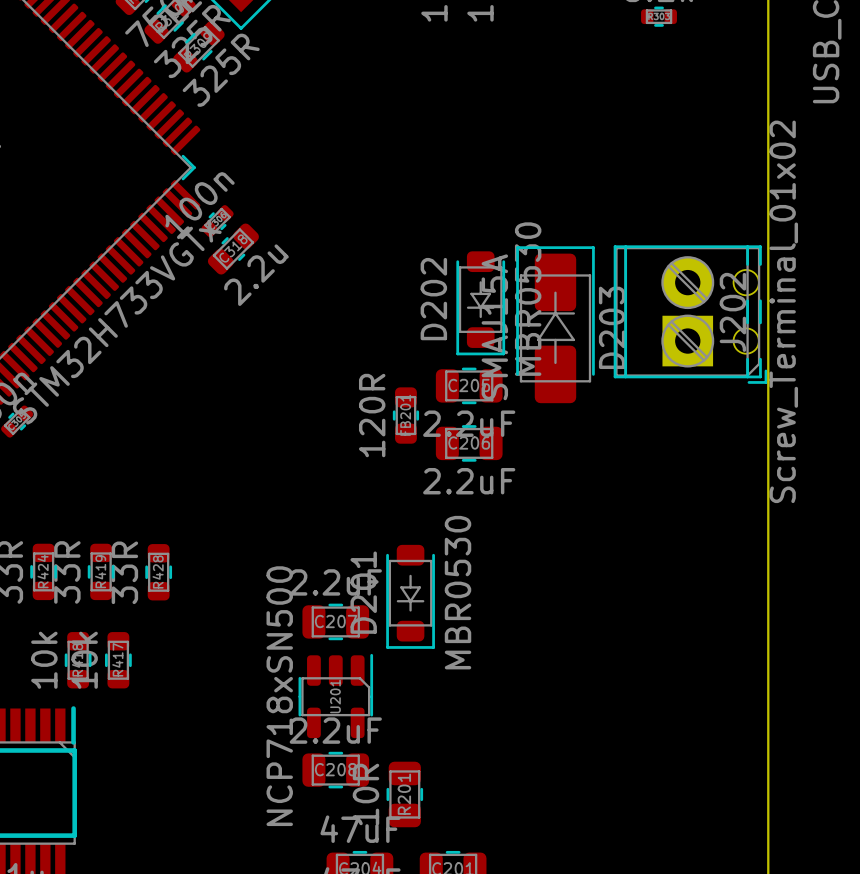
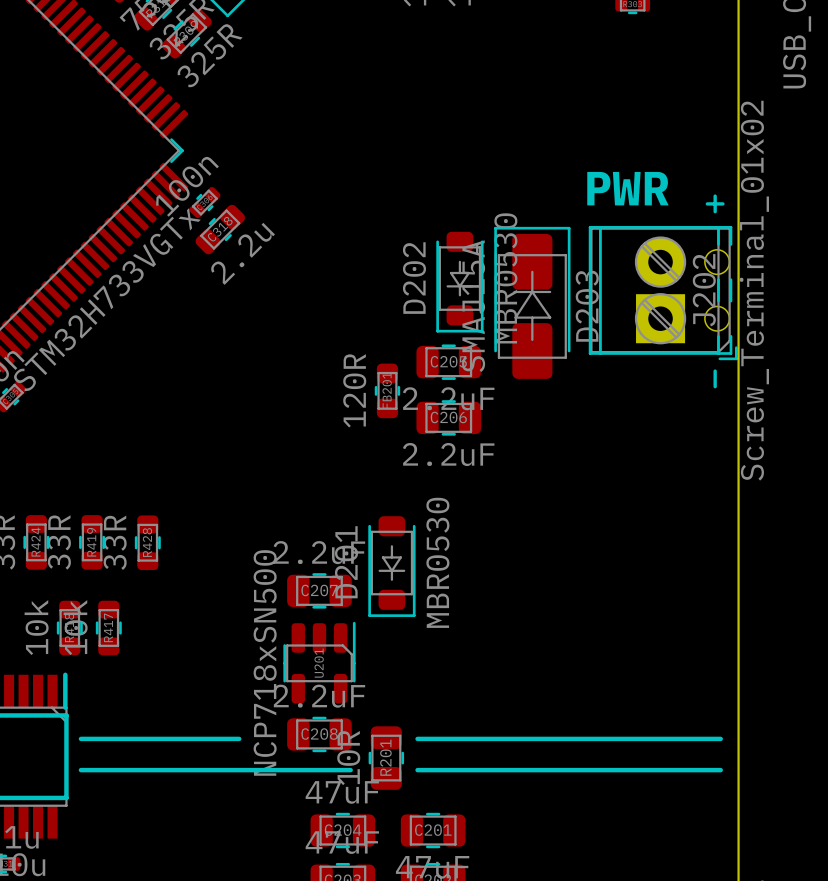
text: none -> PWR (627, 188)
line: none -> (715, 196) (715, 211)
line: none -> (707, 203) (722, 203)
line: none -> (715, 371) (715, 386)
line: none -> (80, 738) (239, 738)
line: none -> (417, 738) (720, 738)
line: none -> (80, 770) (350, 770)
line: none -> (417, 770) (720, 770)

